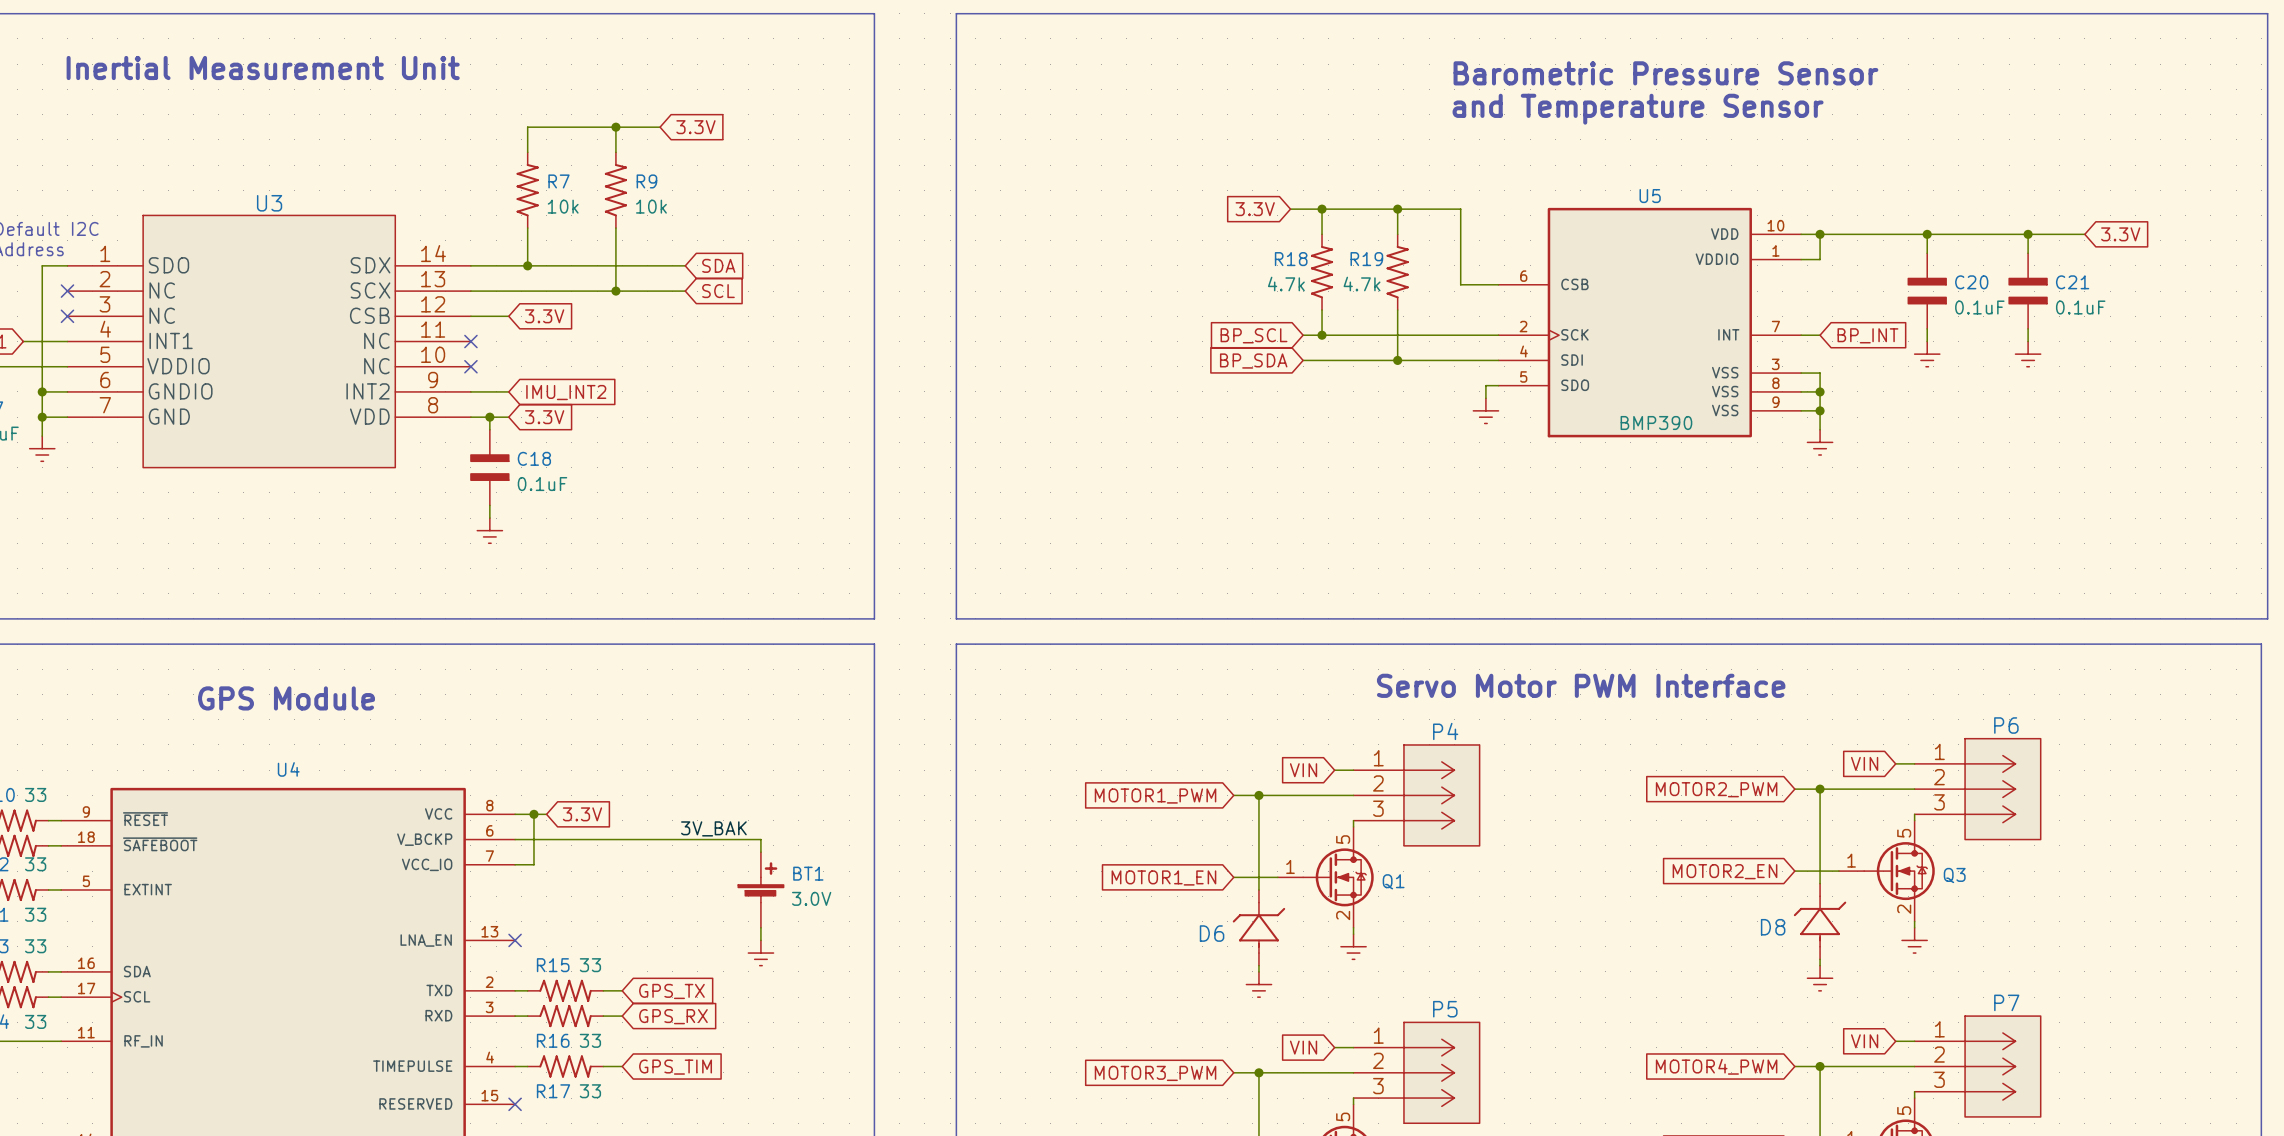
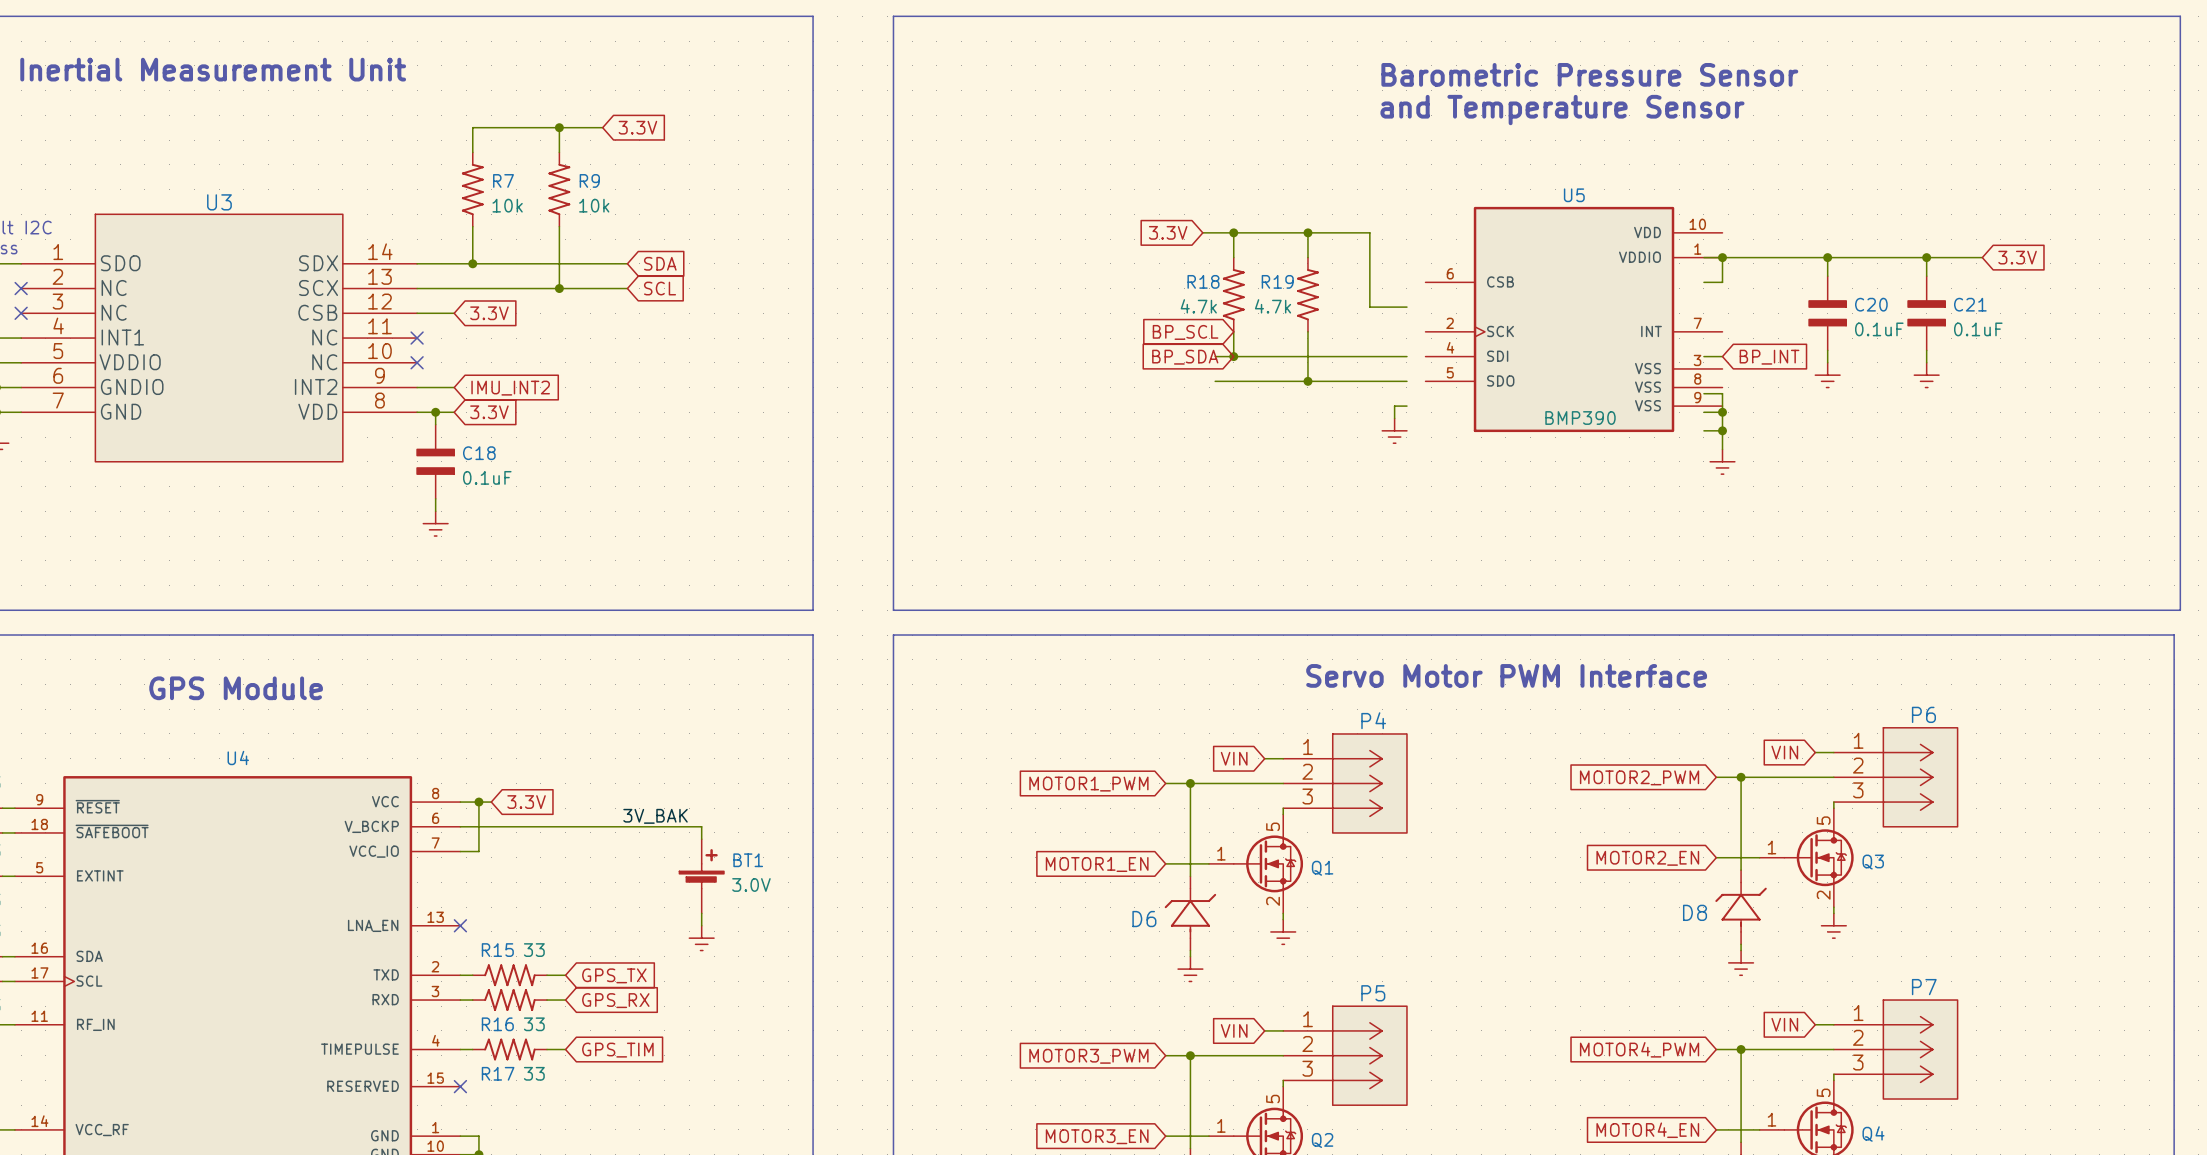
global label position: 3.3V (1255, 209) -> 3.3V (1168, 232)
wire: (1290, 209) (1460, 209) (1460, 284) (1498, 284) -> (1202, 232) (1369, 232) (1369, 307) (1406, 307)
wire: (1322, 209) (1322, 234) -> (1233, 232) (1233, 257)
junction: (1322, 209) -> none
wire: (1397, 209) (1397, 234) -> (1307, 232) (1307, 257)
junction: (1397, 209) -> none
junction: none -> (1233, 232)
junction: none -> (1307, 232)
wire: (1801, 234) (2084, 234) -> none
wire: (1820, 234) (1820, 259) -> (1982, 257) (1741, 257)
junction position: (1820, 234) -> (1722, 257)
wire: (1927, 234) (1927, 253) -> (1827, 257) (1827, 276)
junction position: (1927, 234) -> (1827, 257)
wire: (2028, 234) (2028, 253) -> (1926, 257) (1926, 276)
junction position: (2028, 234) -> (1926, 257)
global label position: 3.3V (2120, 234) -> 3.3V (2017, 257)
wire: none -> (1703, 257) (1722, 257) (1722, 282) (1703, 282)
R18 position: (1322, 272) -> (1233, 294)
R19 position: (1397, 272) -> (1307, 294)
C20 position: (1927, 291) -> (1827, 313)
C21 position: (2028, 291) -> (1926, 313)
wire: (1322, 310) (1322, 335) -> none
wire: (1397, 310) (1397, 360) -> (1307, 331) (1307, 381)
wire: (1927, 328) (1927, 341) -> (1827, 350) (1827, 362)
wire: (2028, 328) (2028, 341) -> (1926, 350) (1926, 362)
wire: (1303, 335) (1498, 335) -> (1233, 331) (1233, 356) (1215, 356)
junction position: (1322, 335) -> (1233, 356)
wire: (1801, 335) (1820, 335) -> (1703, 356) (1722, 356)
global label position: BP_INT (1867, 335) -> BP_INT (1769, 357)
power symbol position: (1927, 354) -> (1827, 375)
power symbol position: (2028, 354) -> (1926, 375)
junction position: (1397, 360) -> (1307, 381)
wire: (1479, 360) (1498, 360) -> none
wire: (1801, 373) (1820, 373) (1820, 429) -> (1703, 393) (1722, 393) (1722, 449)
wire: none -> (1215, 381) (1406, 381)
wire: (1498, 385) (1485, 385) (1485, 398) -> (1406, 406) (1394, 406) (1394, 418)
wire: (1801, 391) (1820, 391) -> (1703, 412) (1722, 412)
junction: (1820, 391) -> none
power symbol position: (1485, 410) -> (1394, 430)
wire: (1801, 410) (1820, 410) -> (1703, 430) (1722, 430)
junction: (1820, 410) -> none
junction: none -> (1722, 412)
junction: none -> (1722, 430)
power symbol position: (1820, 442) -> (1722, 461)

